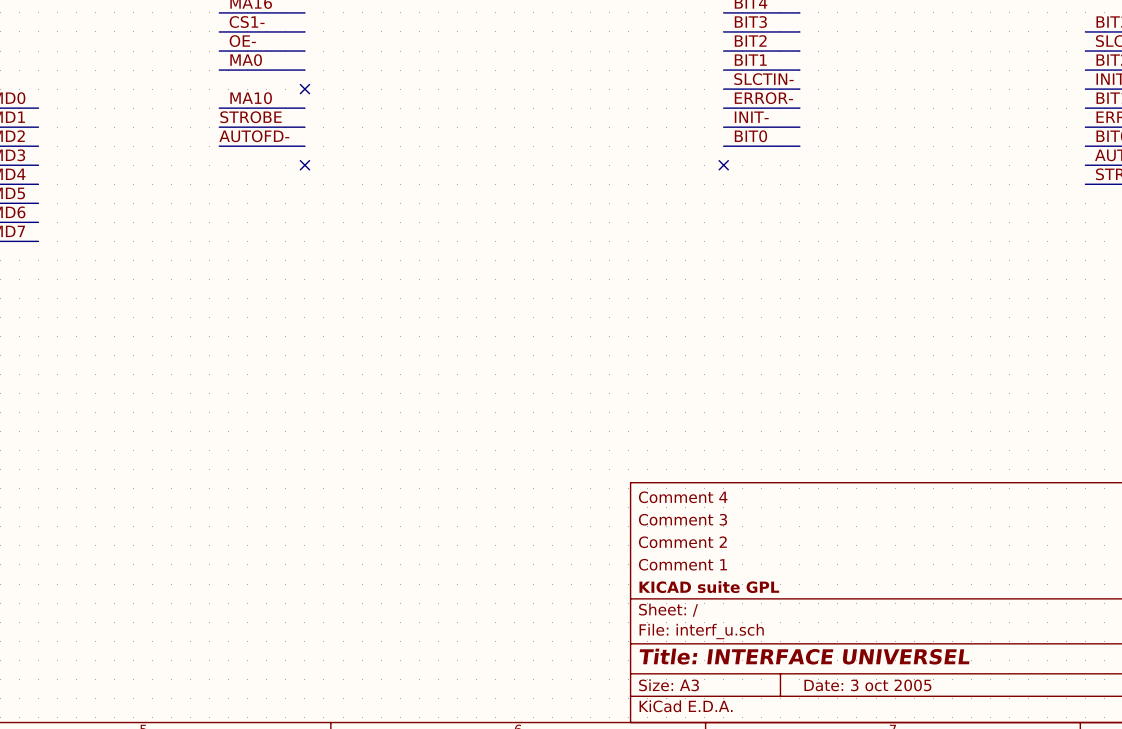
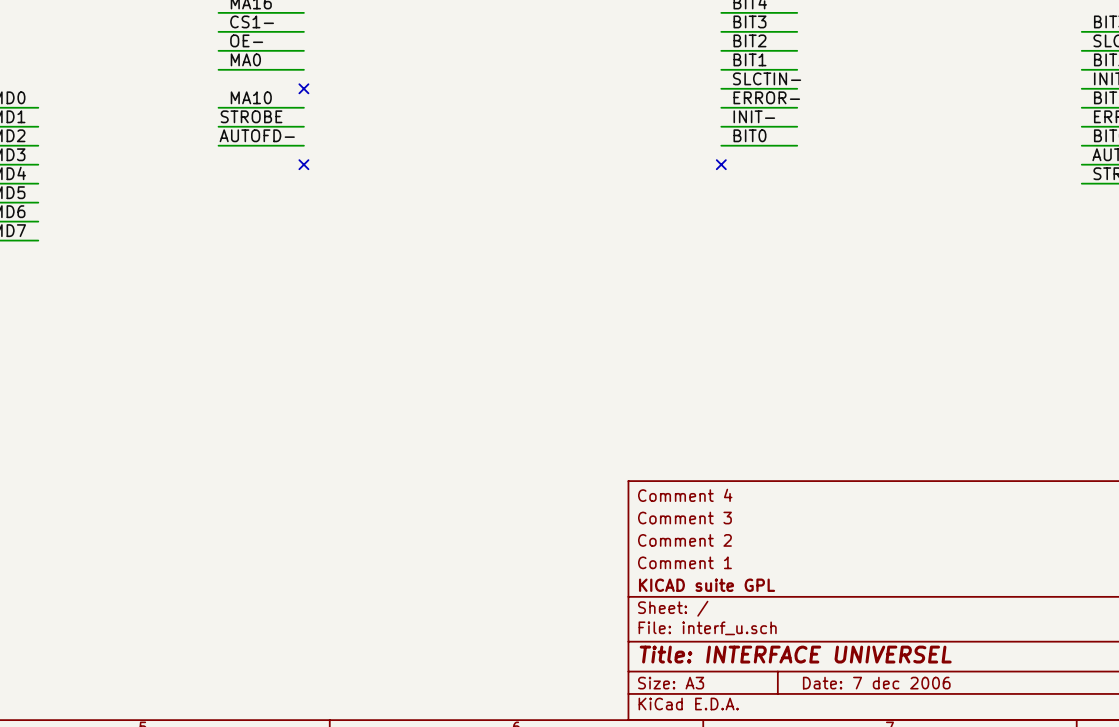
title block: Date: 3 oct 2005 (867, 685) -> Date: 7 dec 2006 (876, 683)

